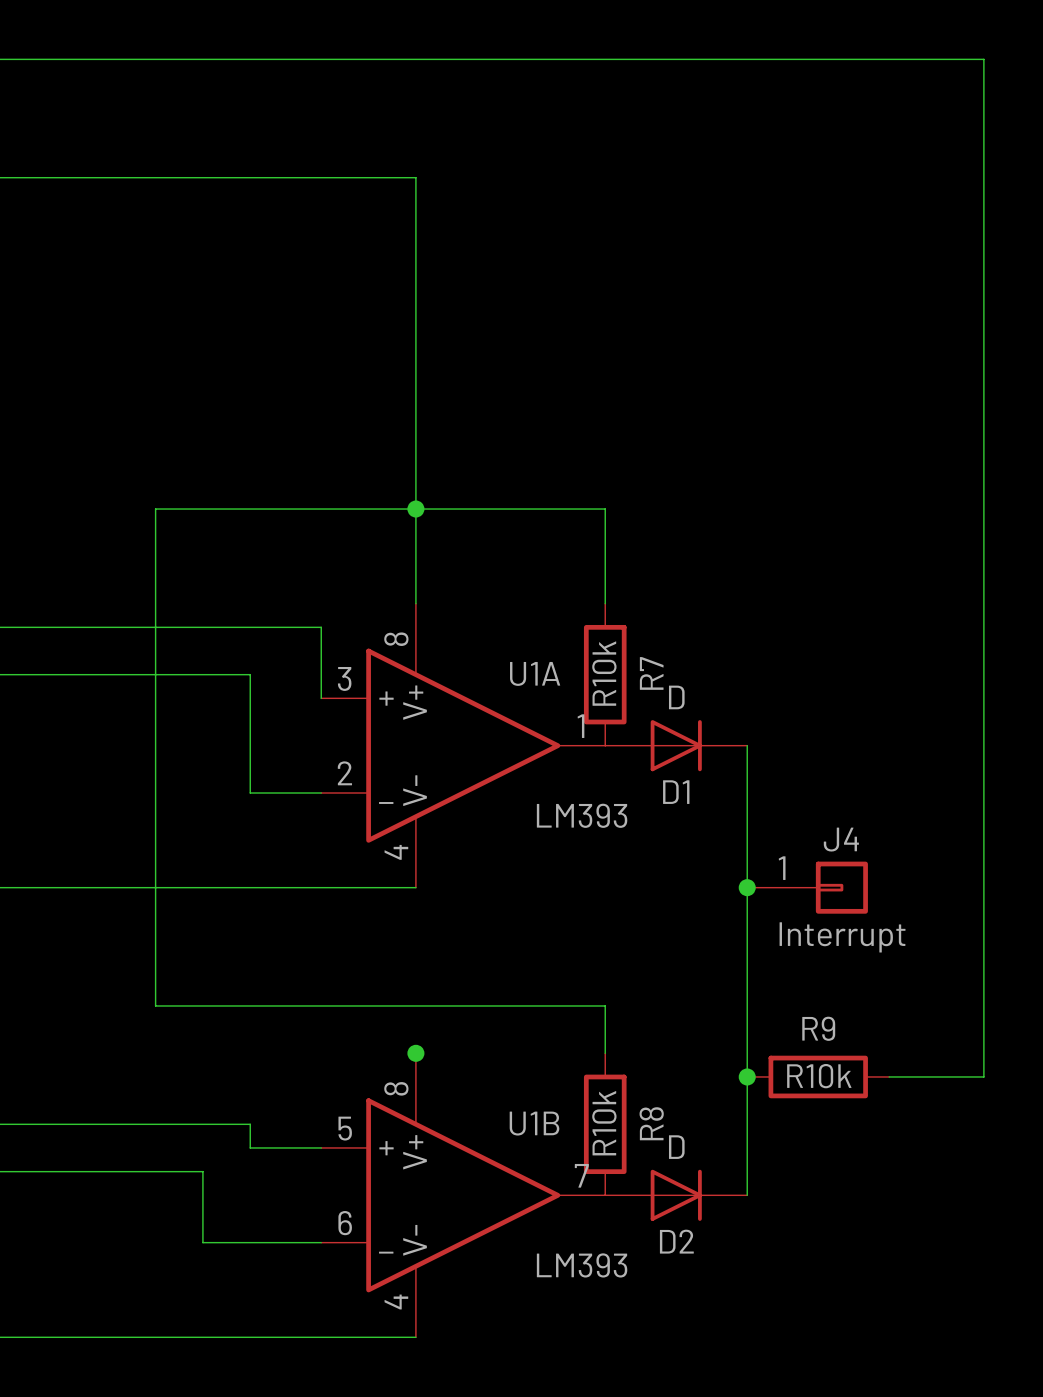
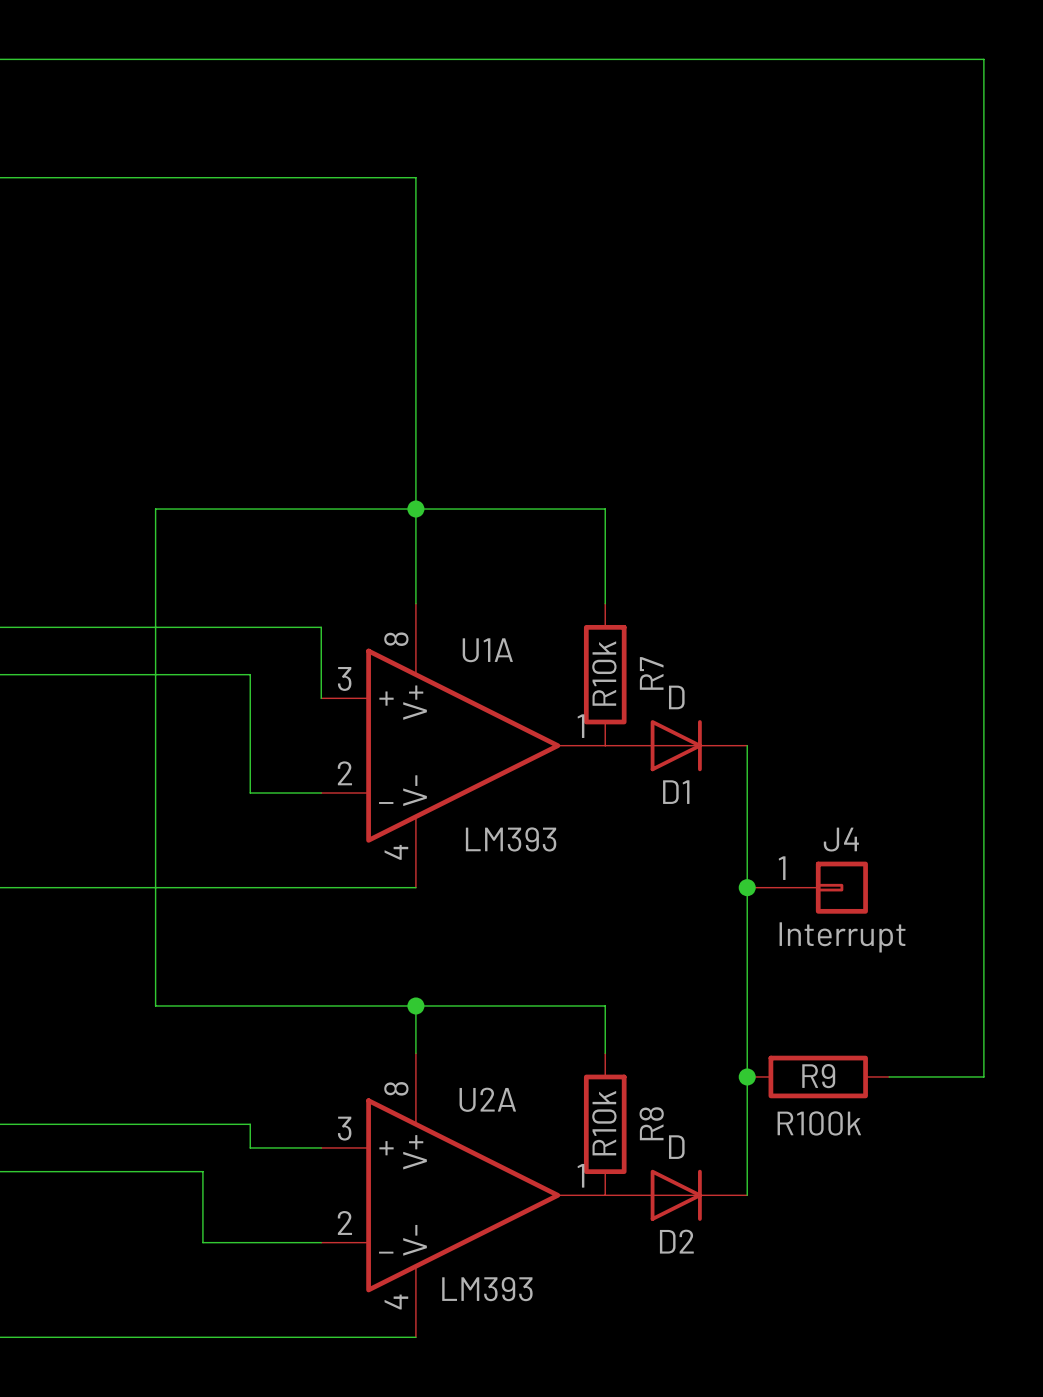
U1A name position: U1A (535, 673) -> U1A (487, 650)
U1A value position: LM393 (582, 815) -> LM393 (511, 839)
wire: none -> (415, 1005) (415, 1053)
R9 name position: R9 (818, 1028) -> R9 (818, 1076)
junction position: (415, 1053) -> (415, 1005)
R9 value: R10k (819, 1076) -> R100k (819, 1123)
U1B name: U1B (534, 1123) -> U2A (487, 1099)
U1B pin number: 5 (345, 1128) -> 3 (344, 1128)
U1B pin number: 7 (581, 1175) -> 1 (580, 1175)
U1B pin number: 6 (345, 1223) -> 2 (344, 1222)
U1B value position: LM393 (582, 1265) -> LM393 (487, 1289)

